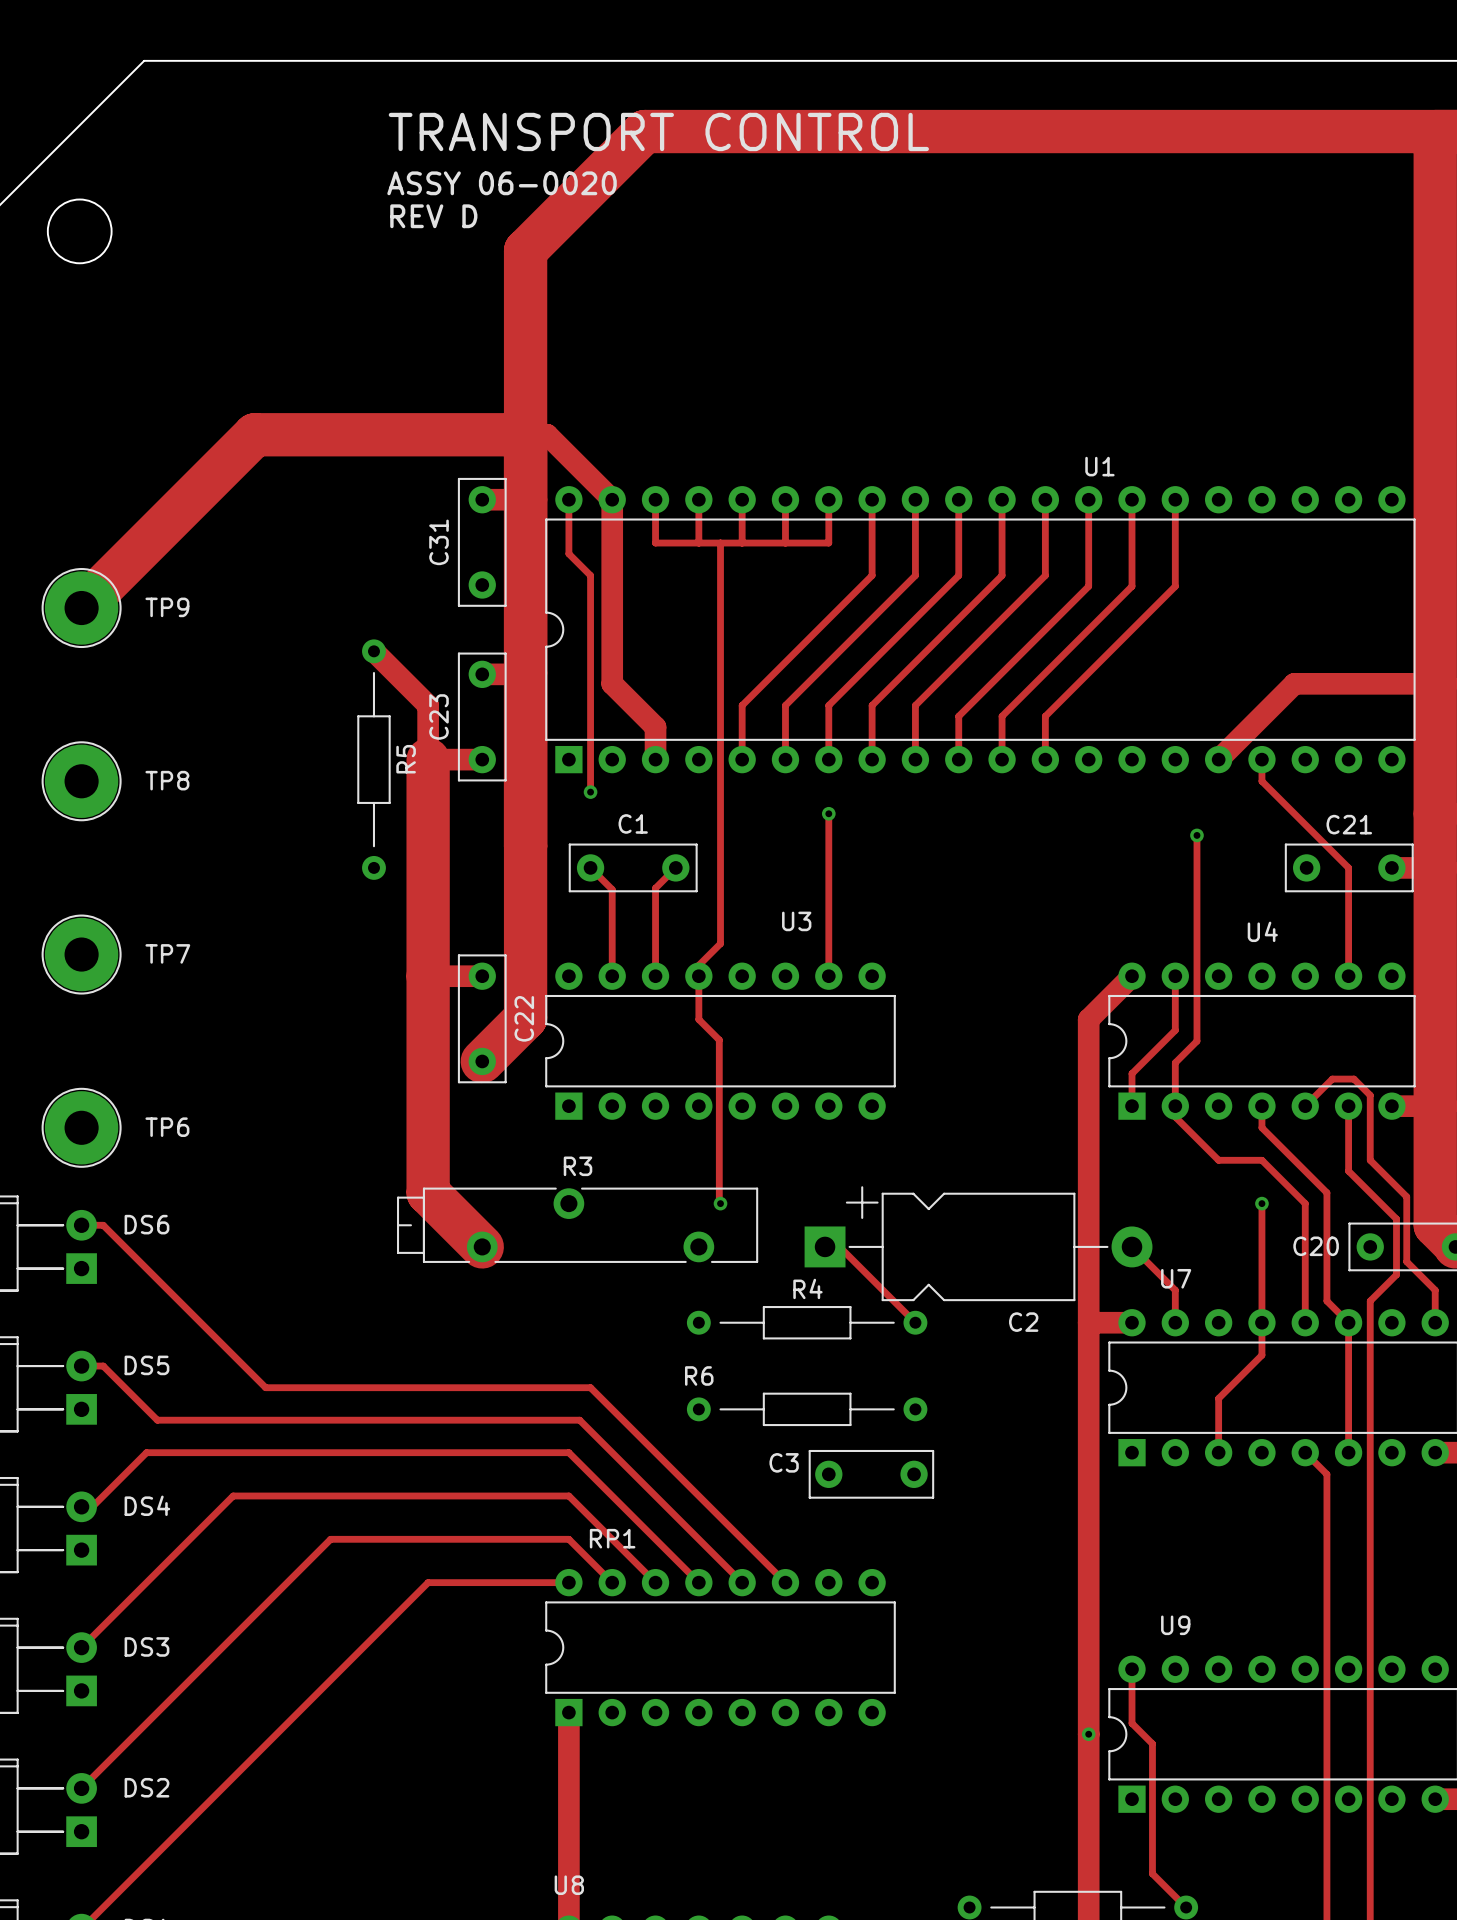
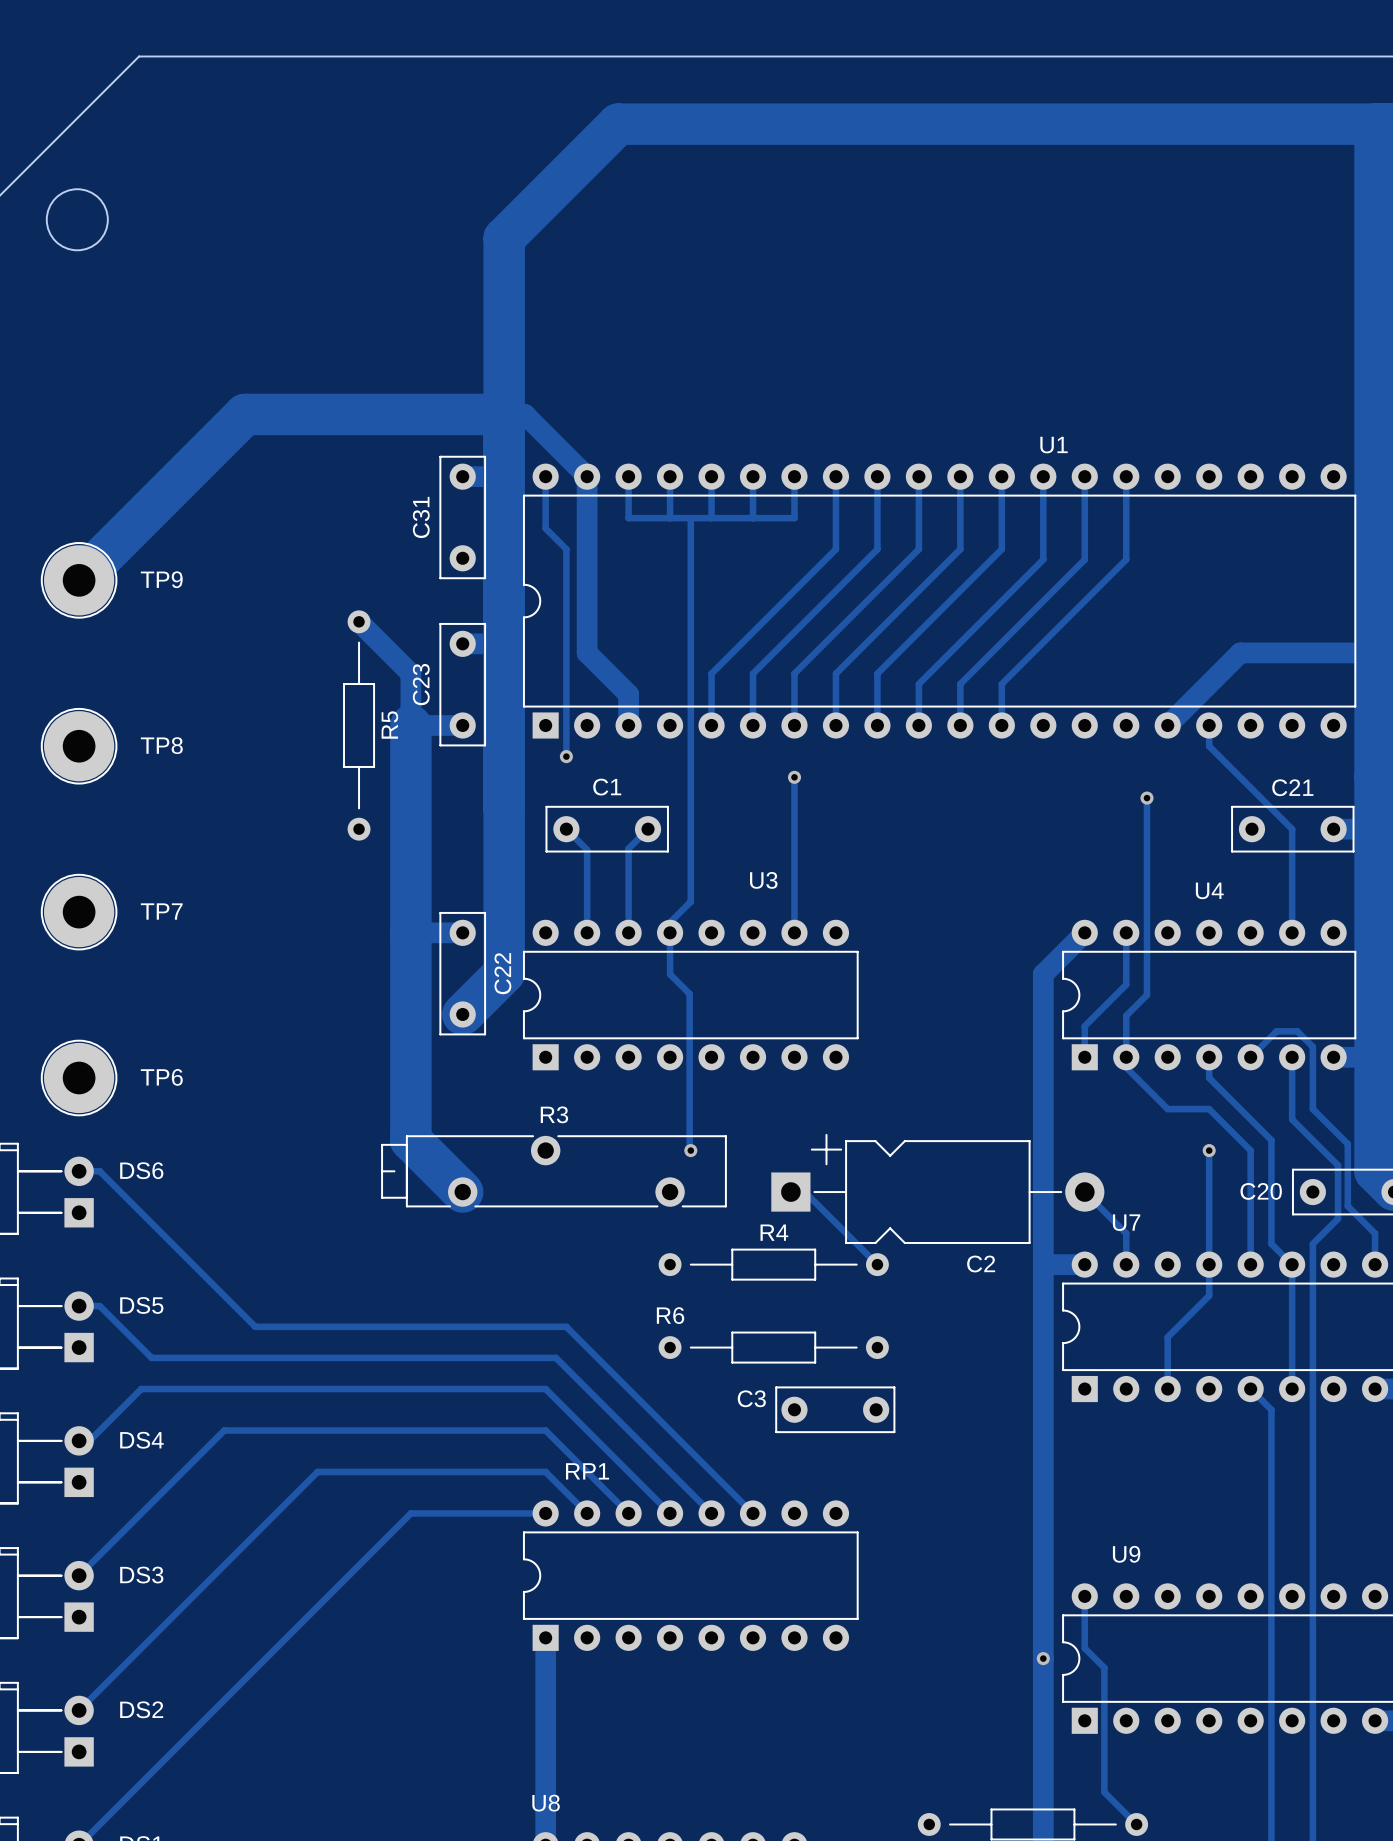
text: TRANSPORT CONTROL (658, 131) -> none
text: ASSY 06-0020 (502, 183) -> none
text: REV D (433, 216) -> none

